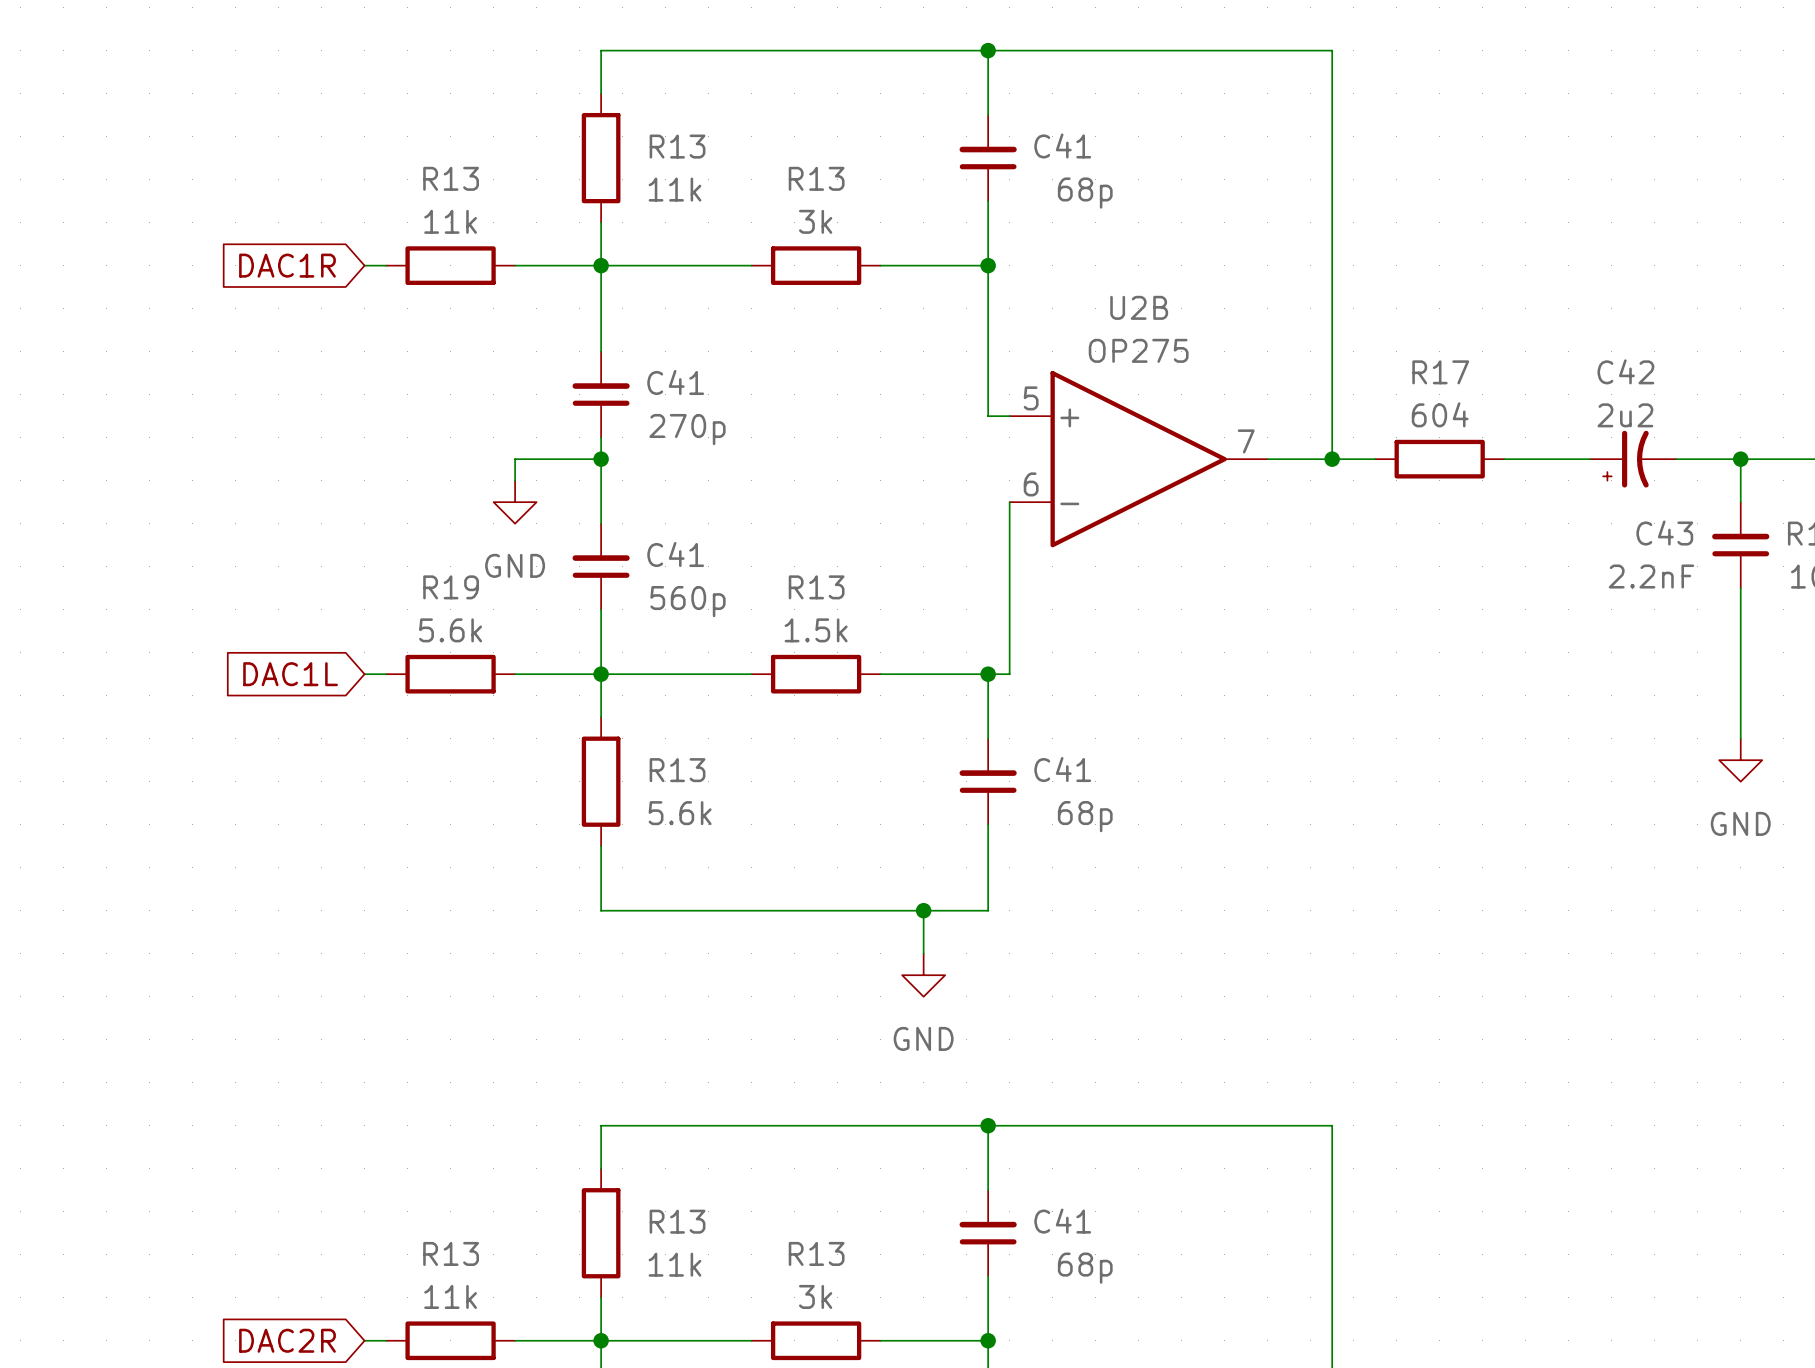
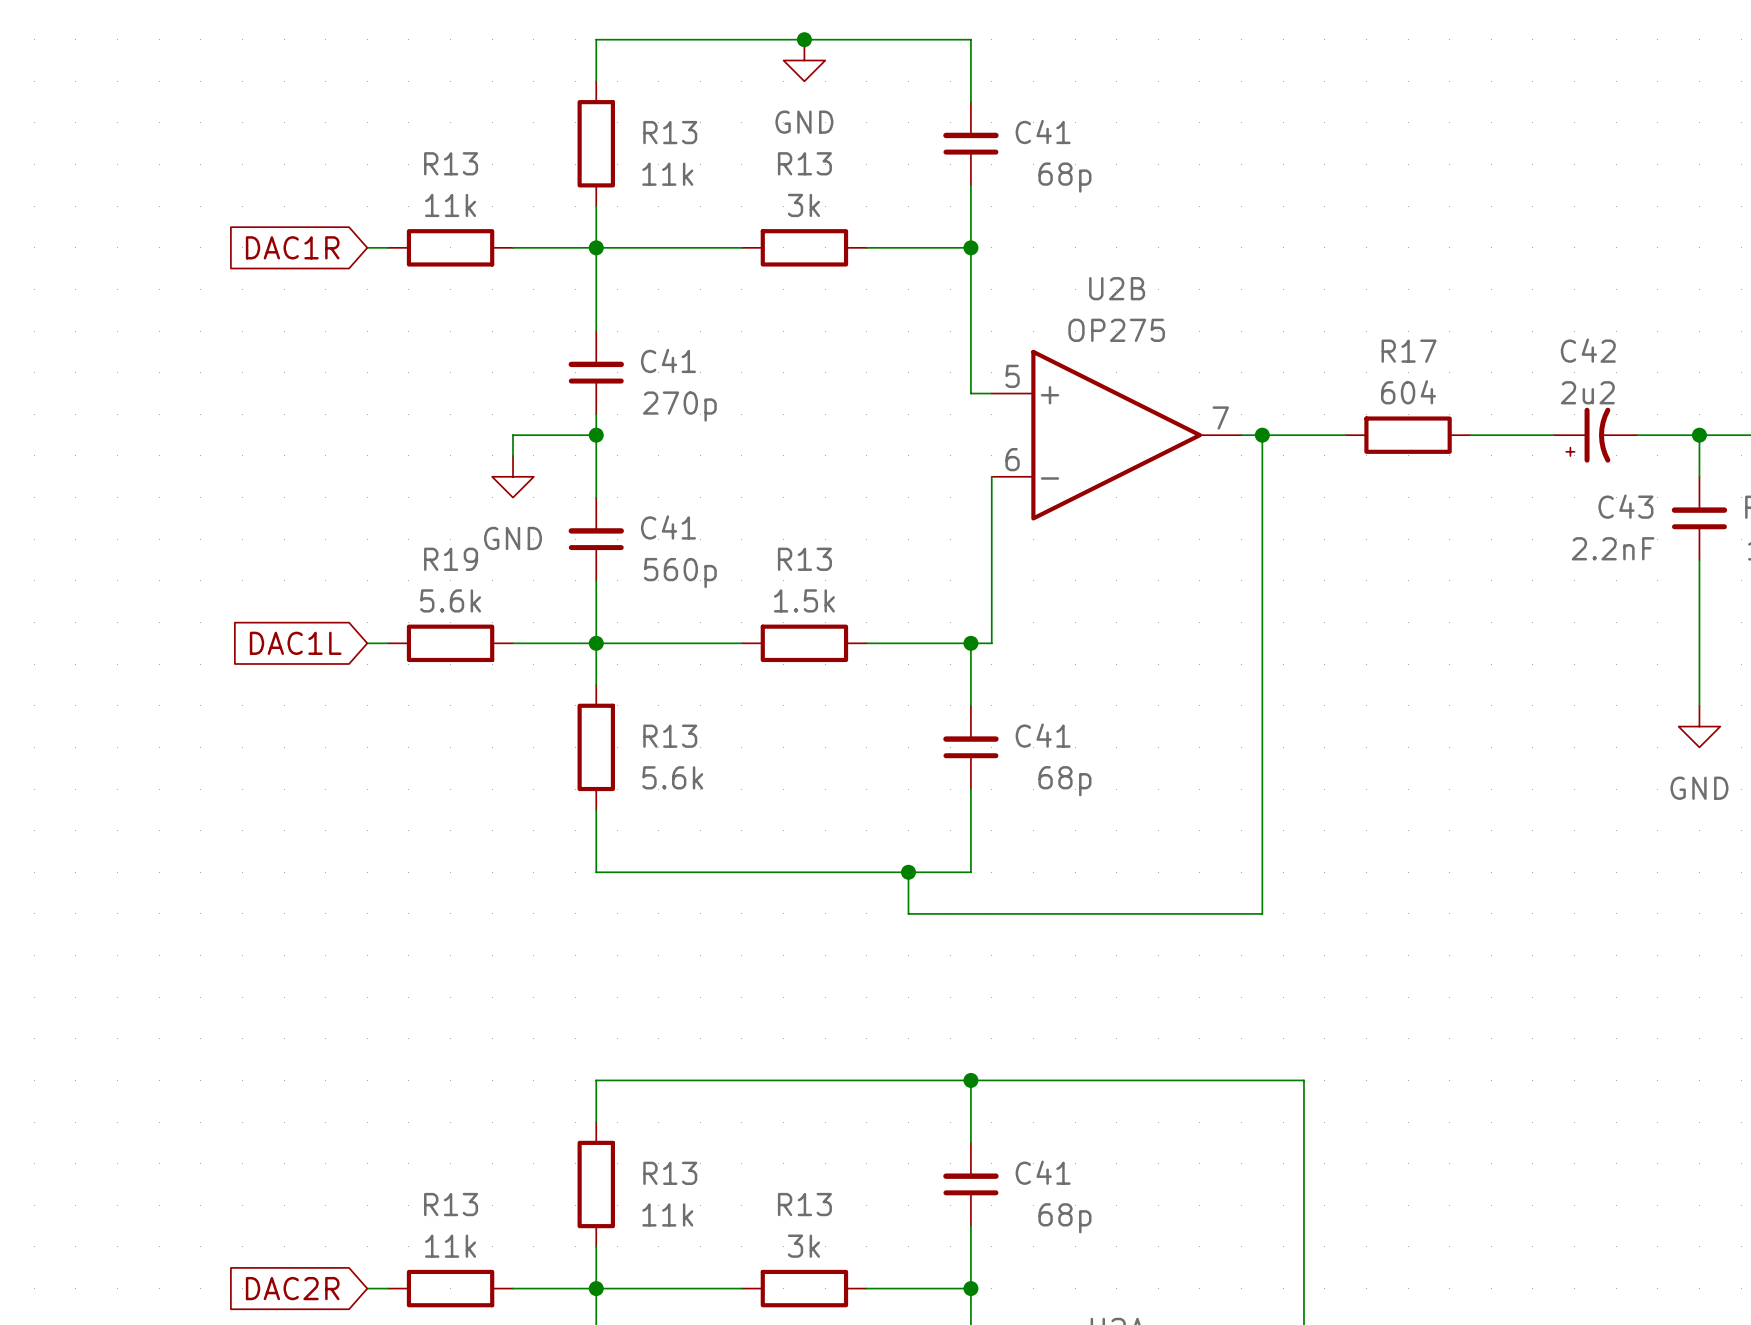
junction: none -> (804, 39)
wire: (988, 50) (1332, 50) (1332, 459) -> none
junction: (988, 50) -> none
power symbol: none -> GND (804, 60)
wire: none -> (1262, 435) (1262, 913) (908, 913)
junction position: (1332, 459) -> (1262, 435)
power symbol: GND (923, 975) -> none

